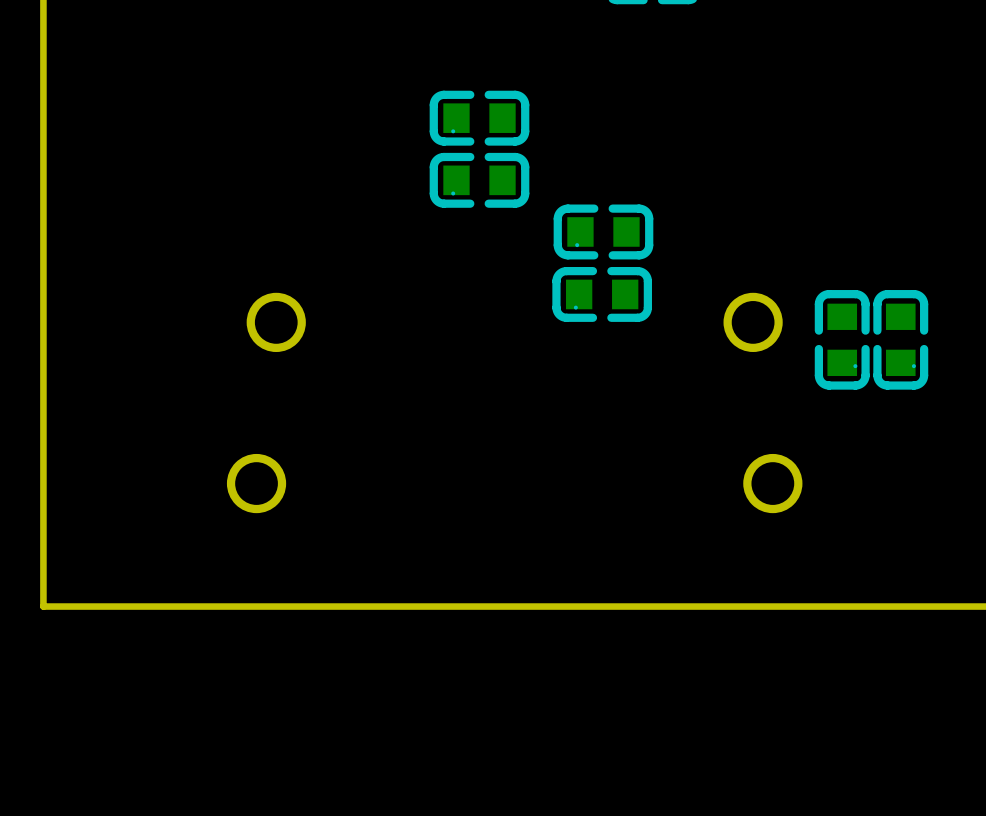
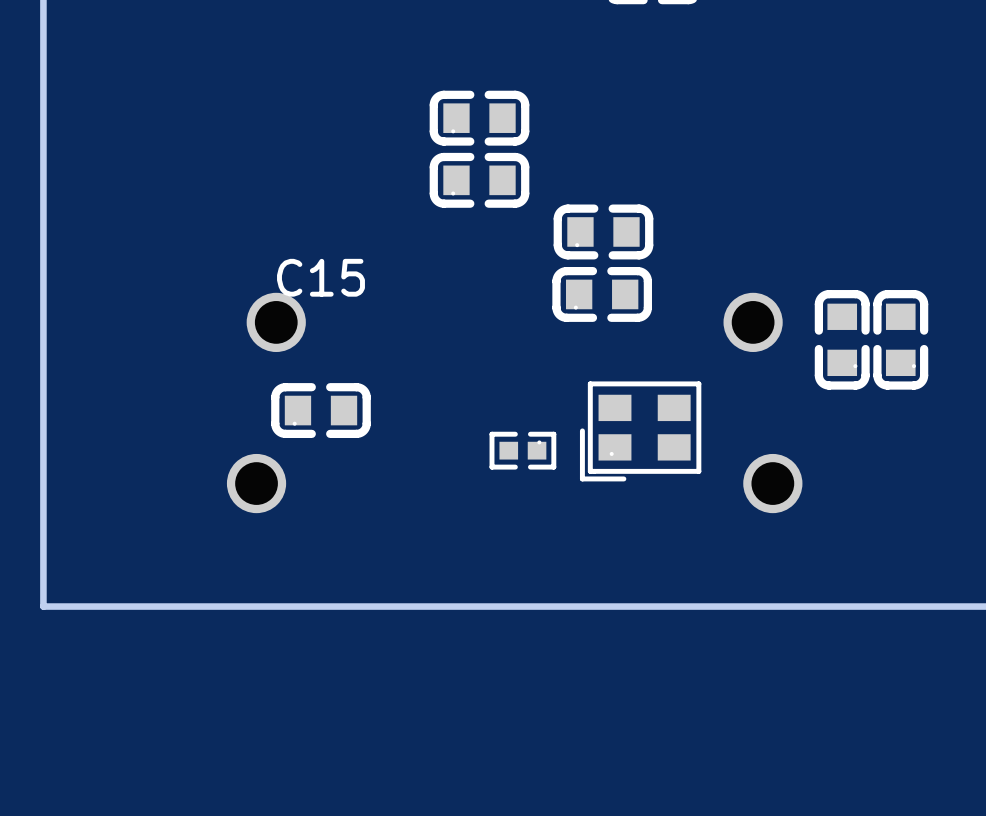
C15: none -> (320, 410)
part: none -> (640, 431)
part: none -> (522, 450)

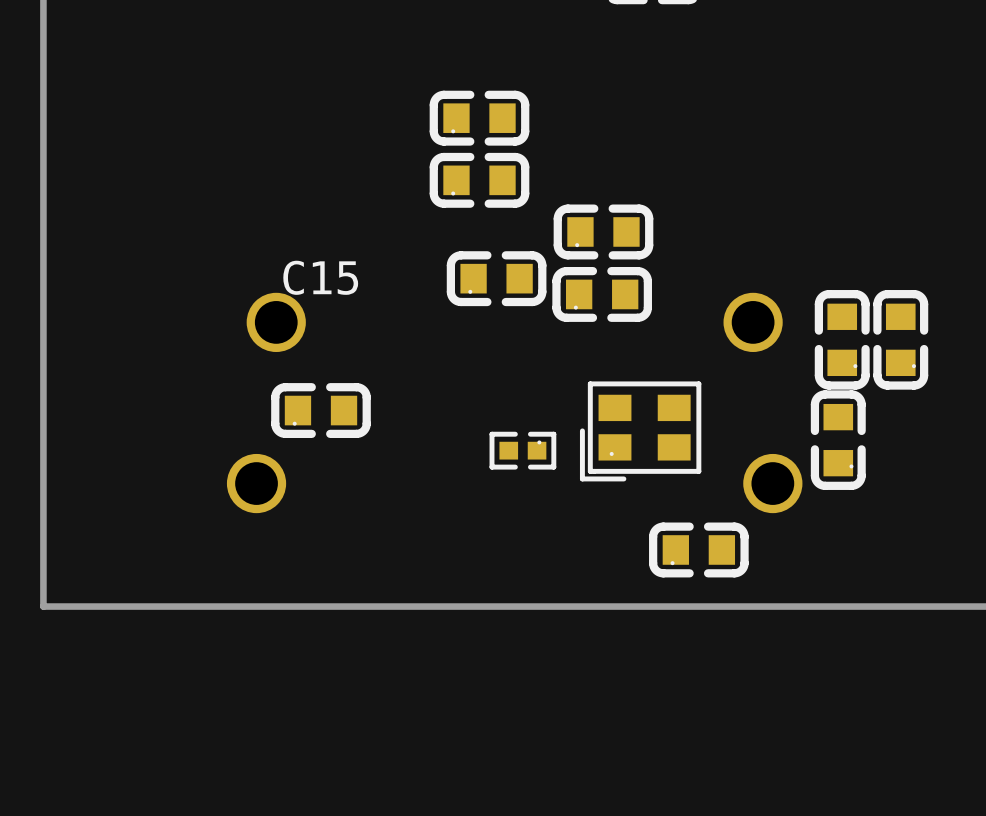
part: none -> (496, 278)
part: none -> (838, 440)
part: none -> (698, 549)

